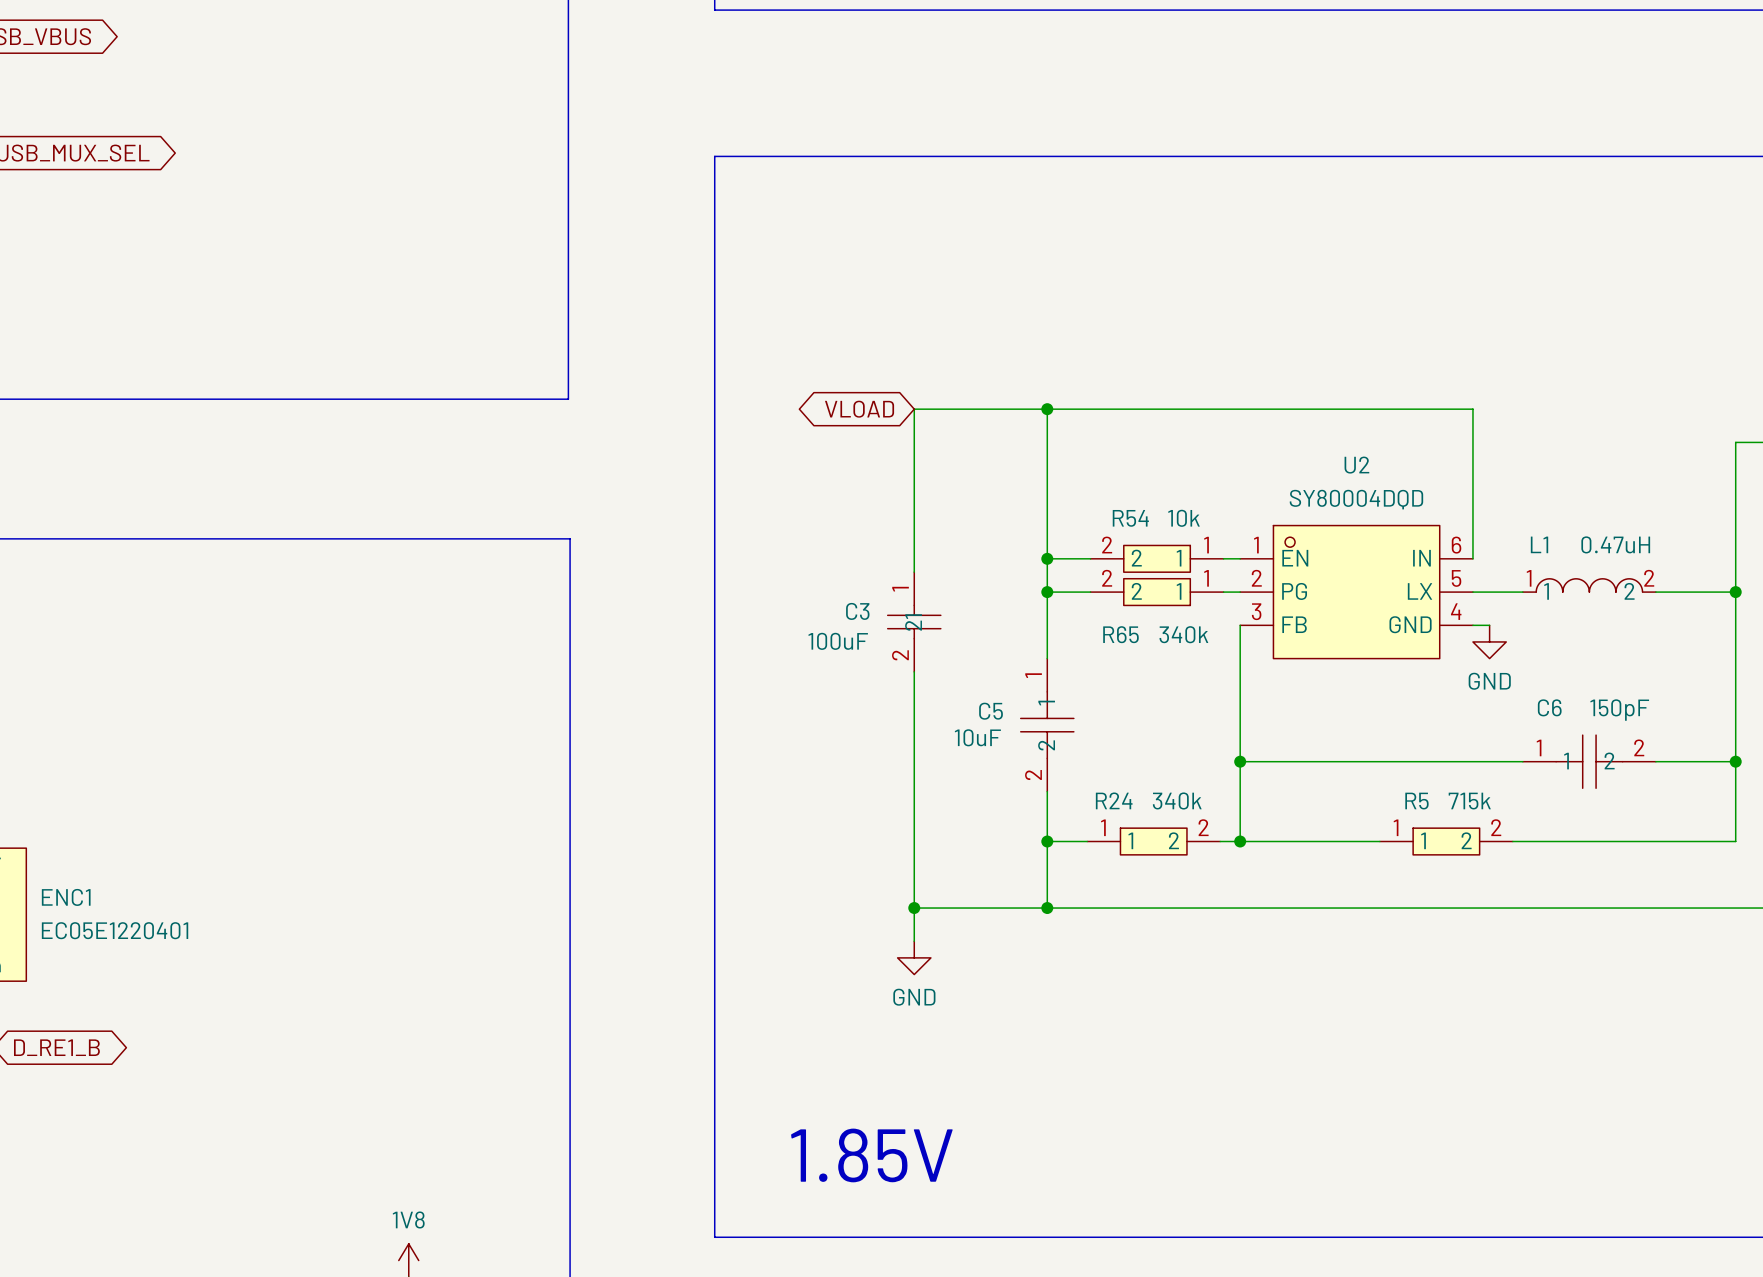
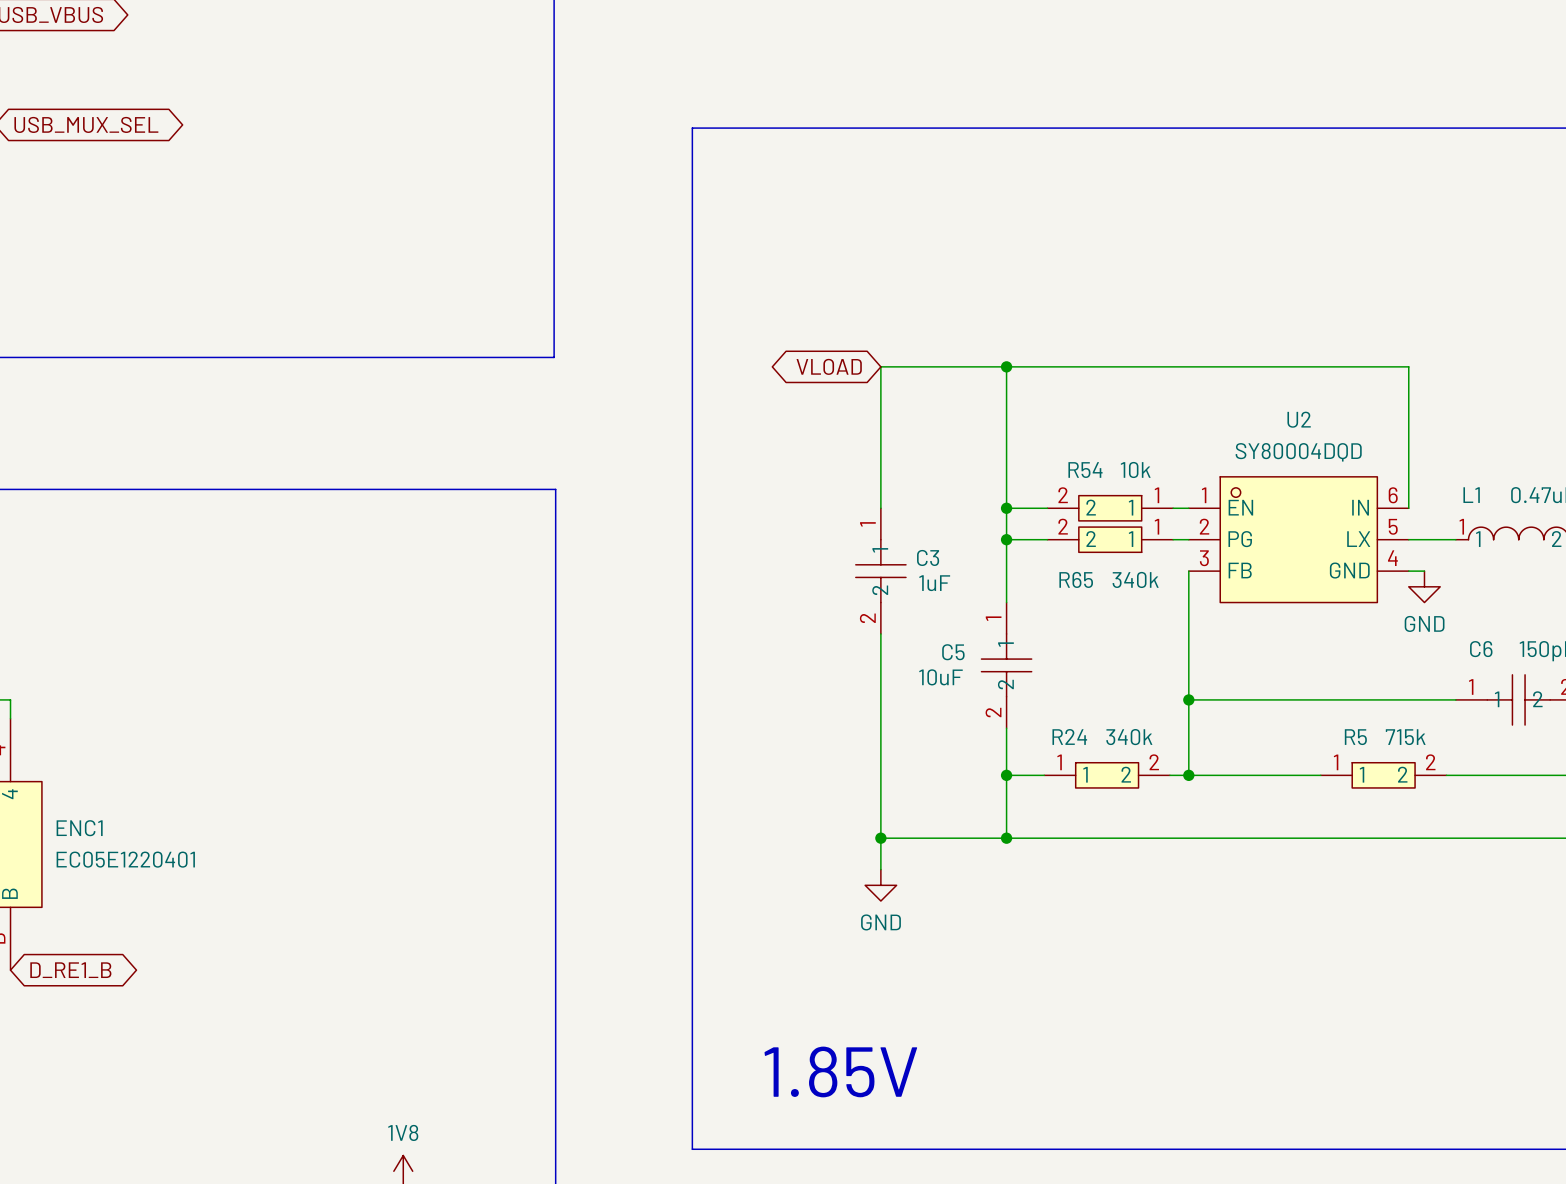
C3 symbol: [887, 572, 941, 672] -> [855, 508, 907, 634]
C3 name position: C3 (857, 611) -> C3 (928, 557)
C3 text: 100uF (838, 641) -> 1uF (934, 583)

